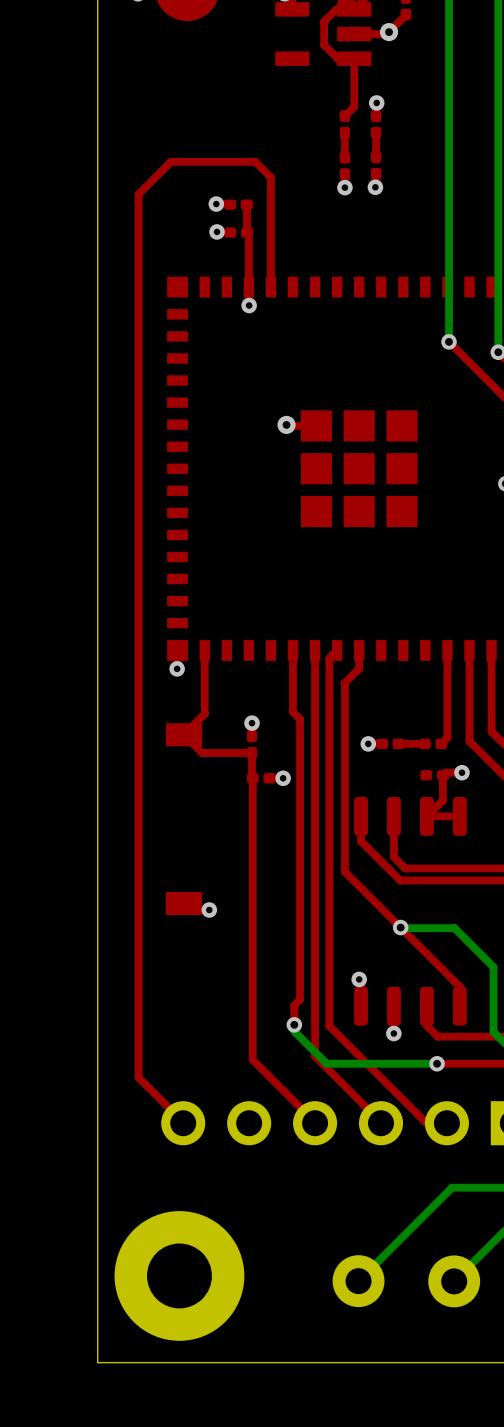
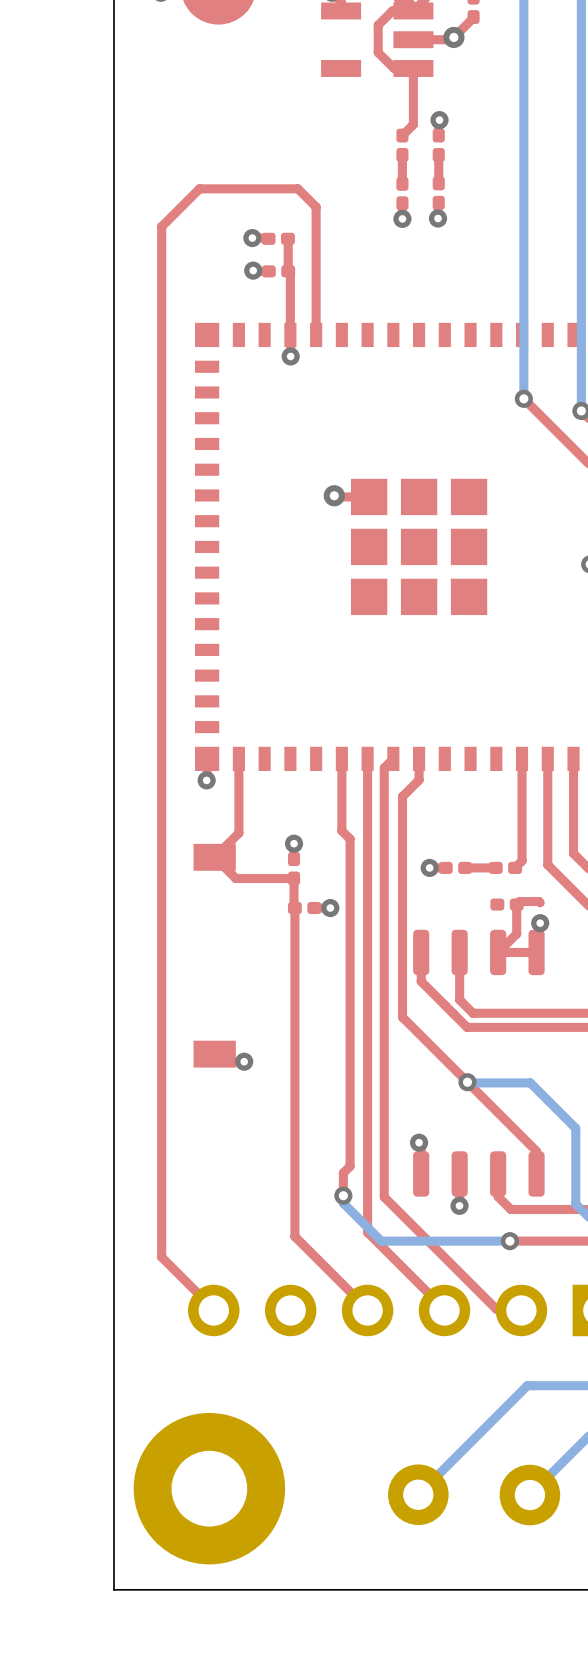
via position: (461, 772) -> (540, 923)

